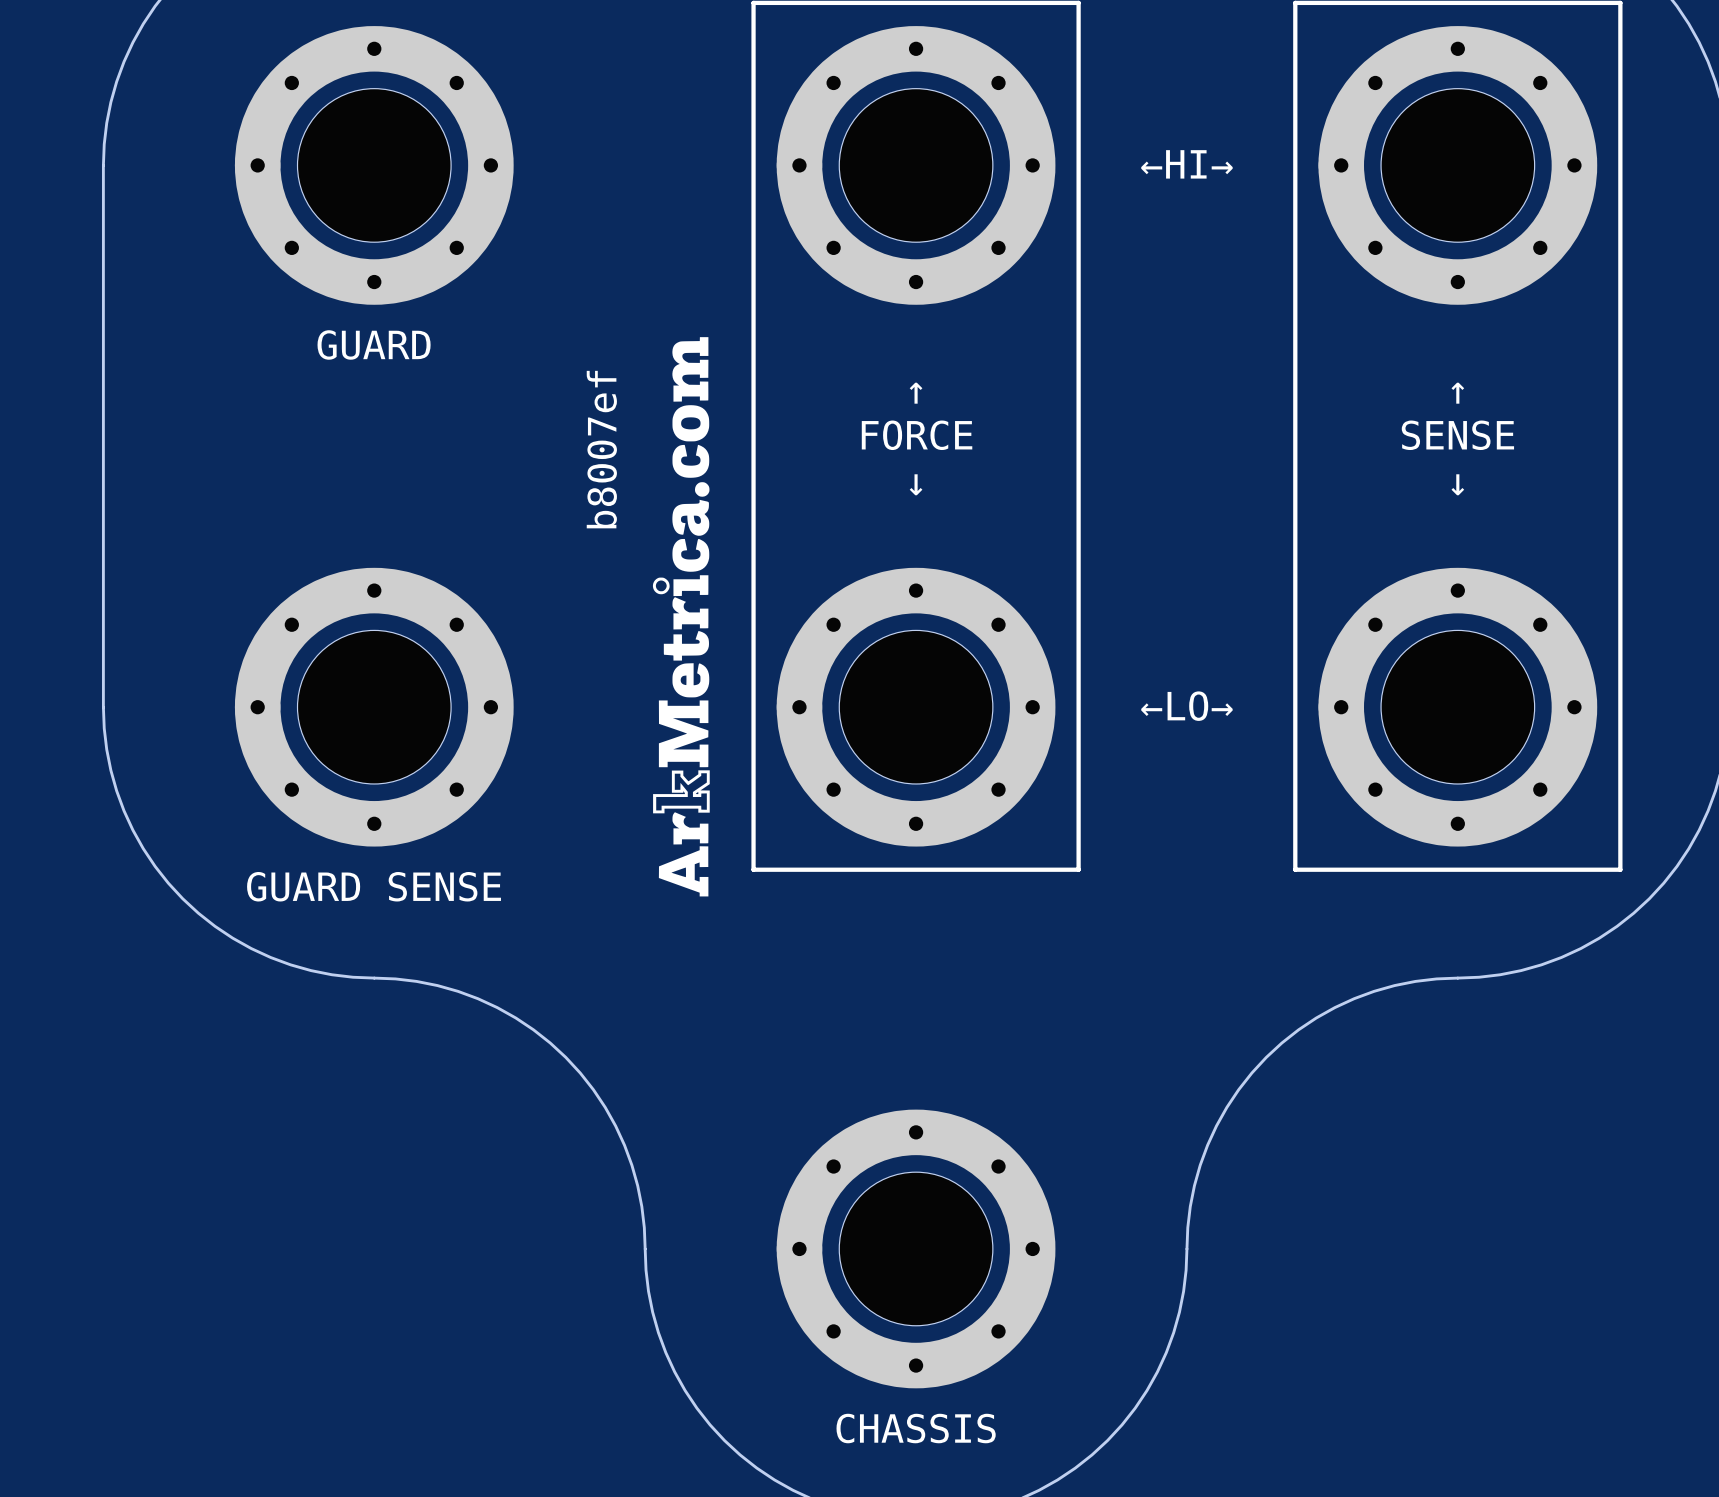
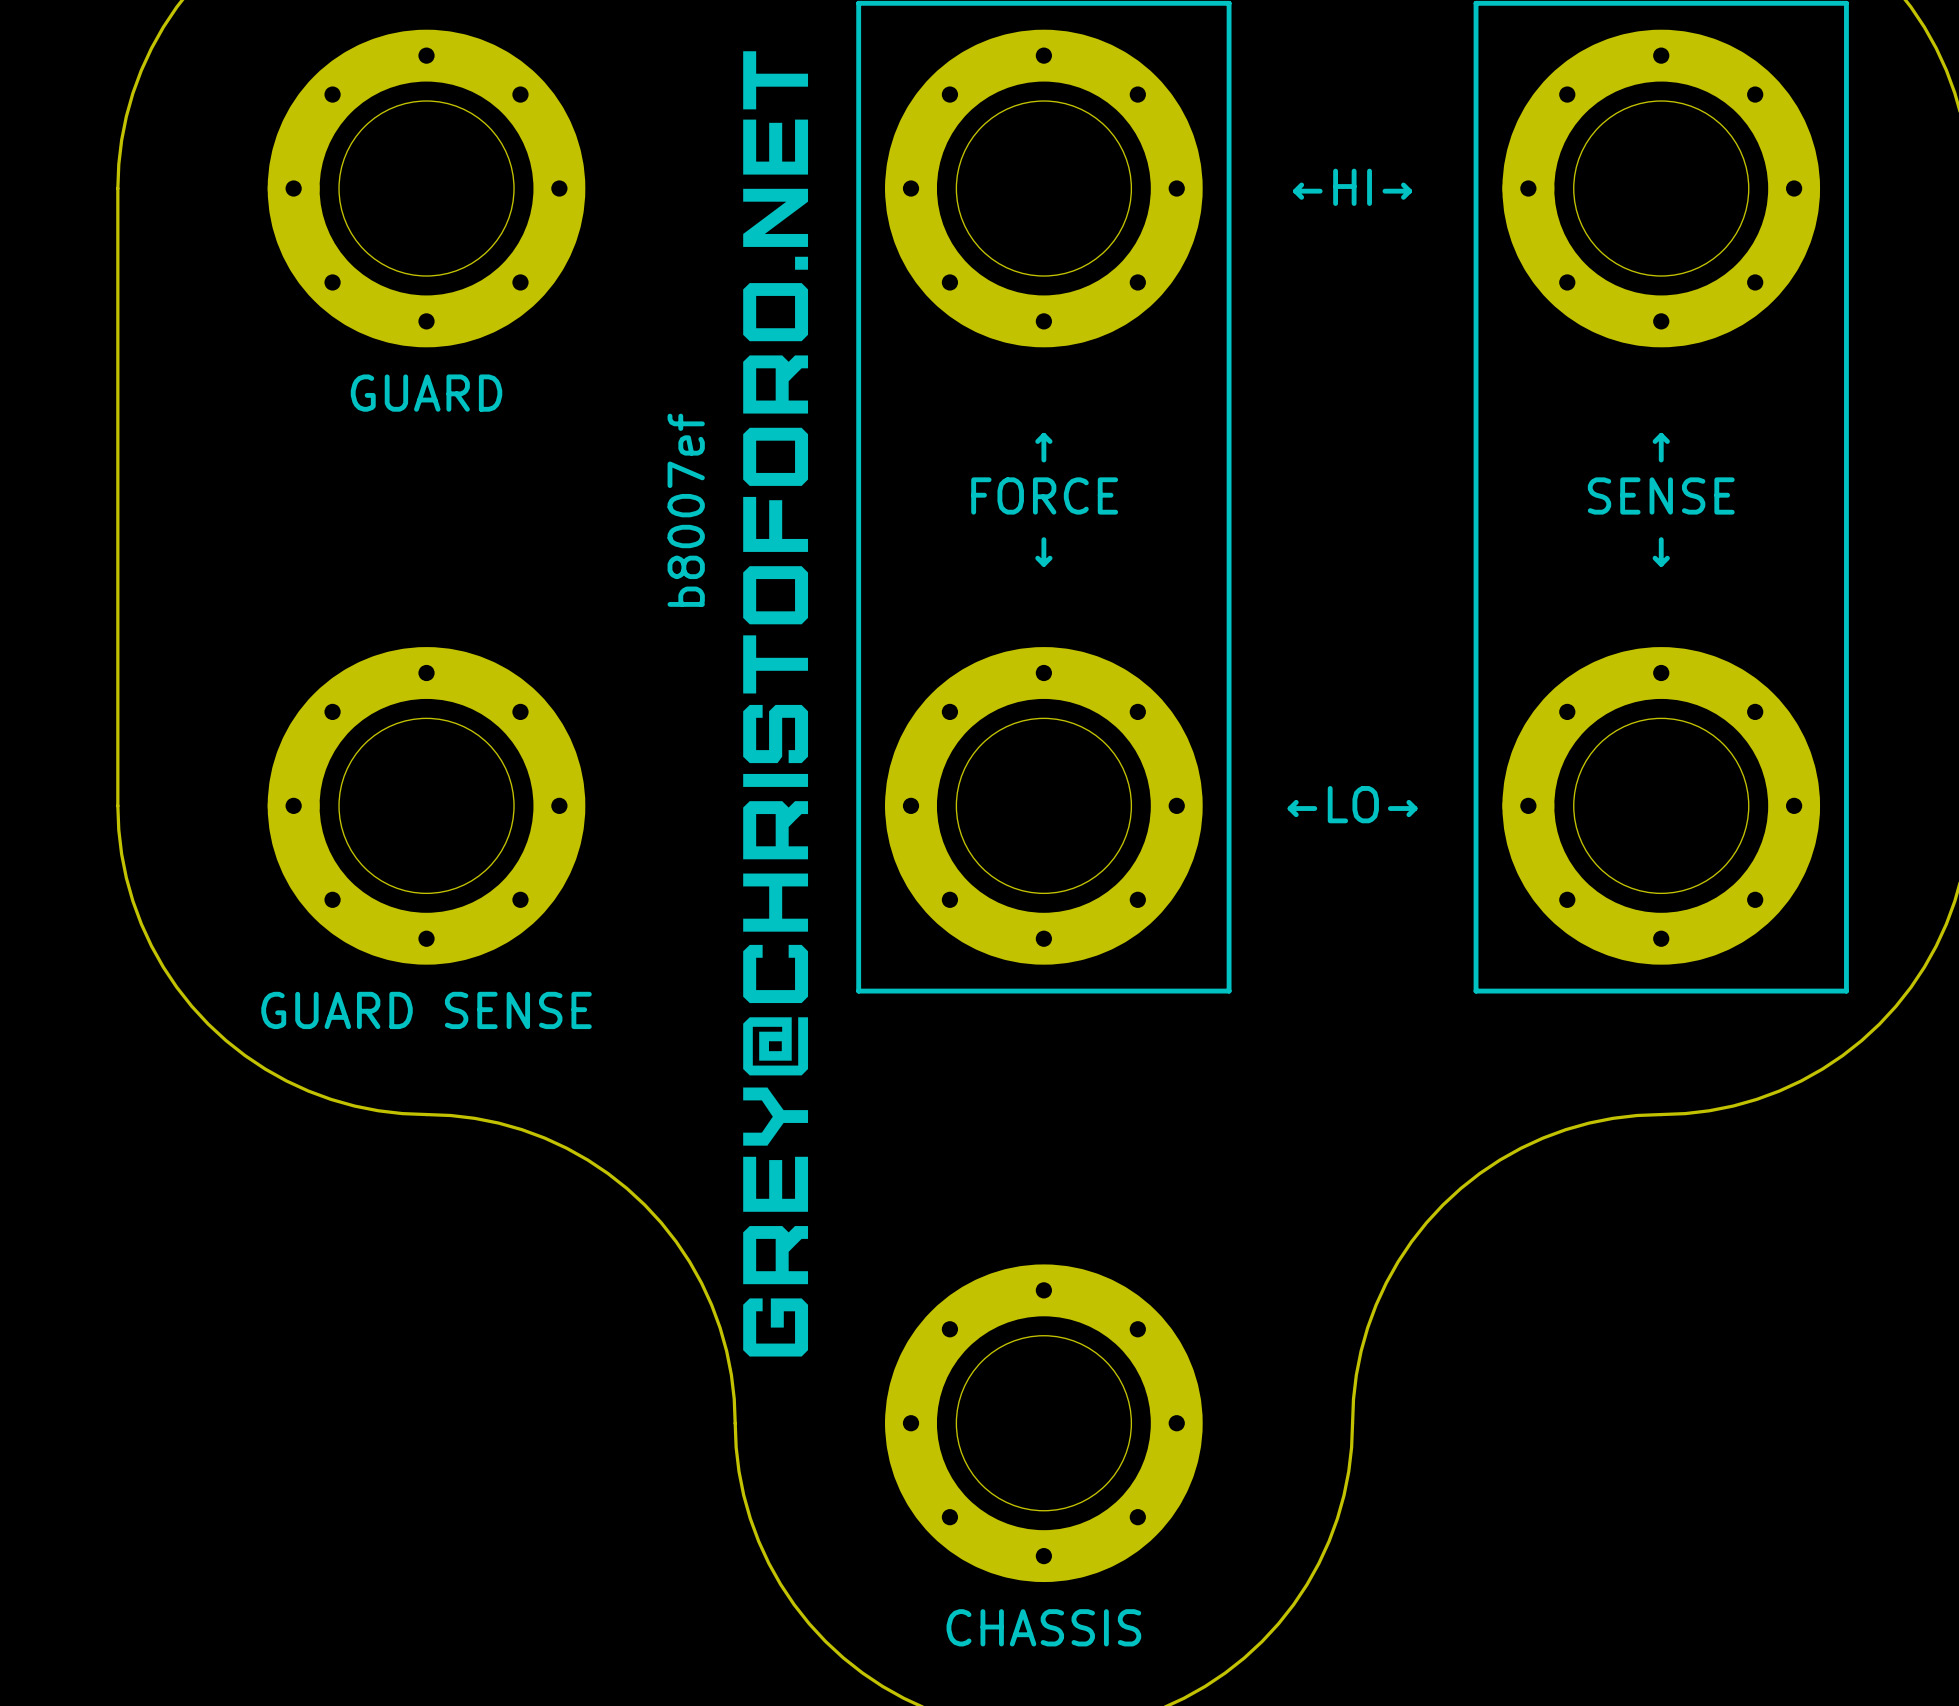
drawing shape: [652, 337, 710, 897] -> [743, 51, 809, 1357]

